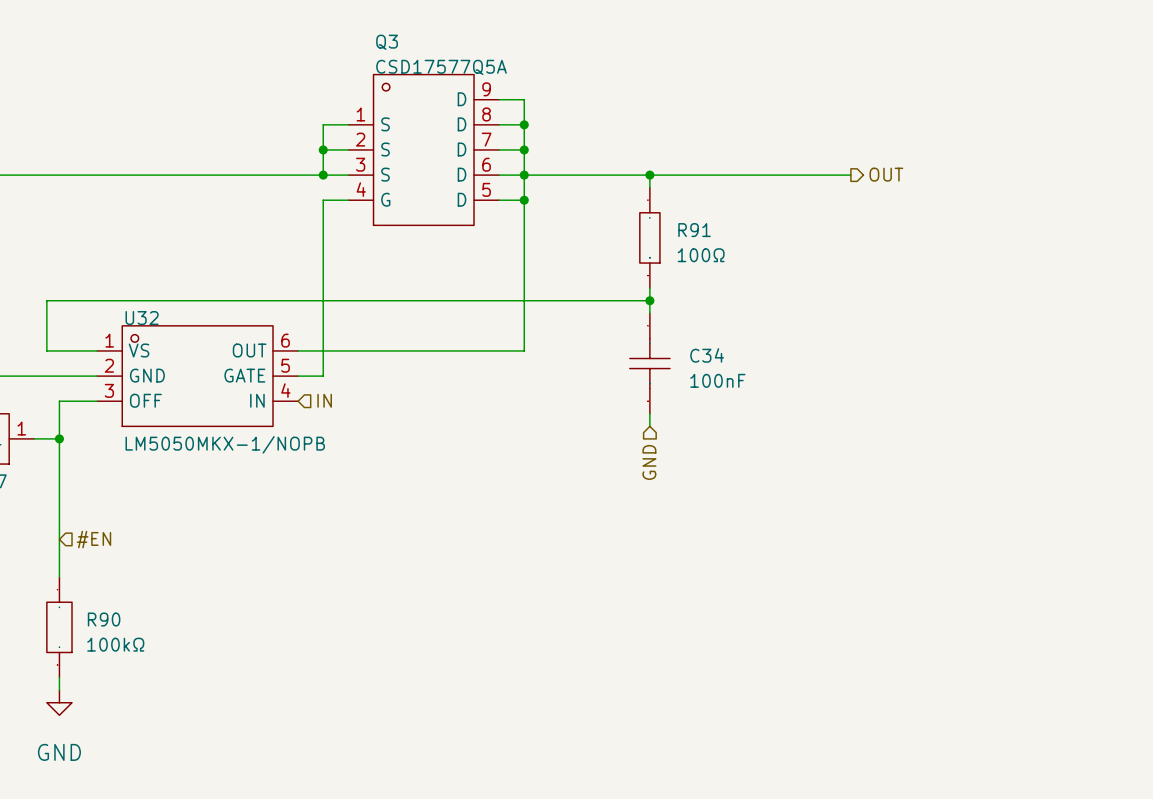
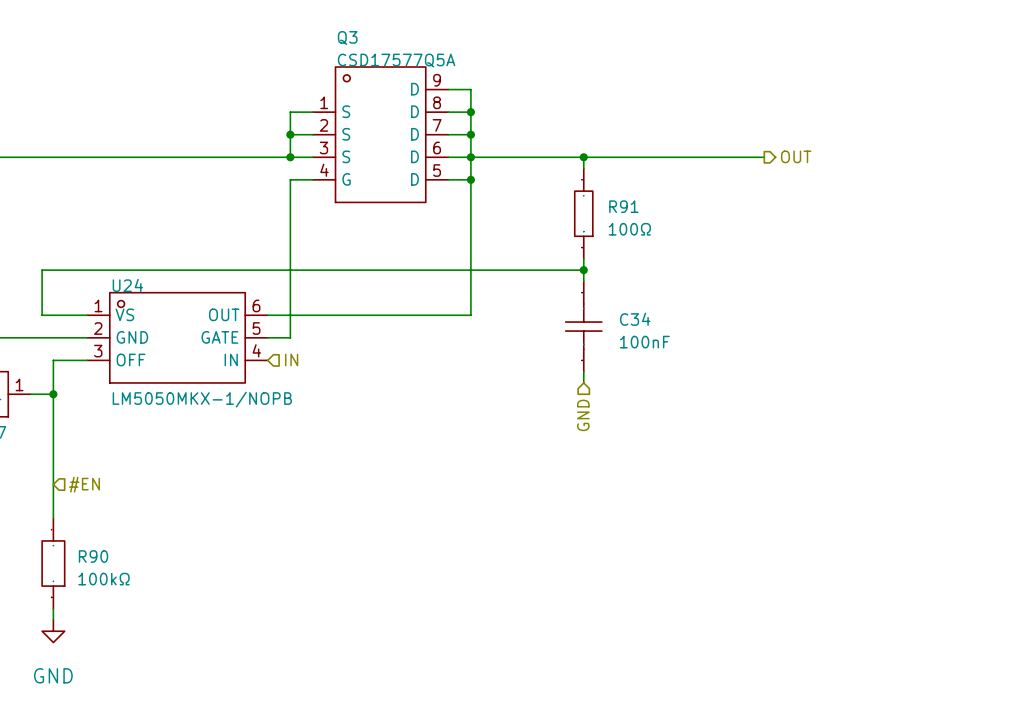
U32 name: U32 (142, 318) -> U24 (127, 285)

